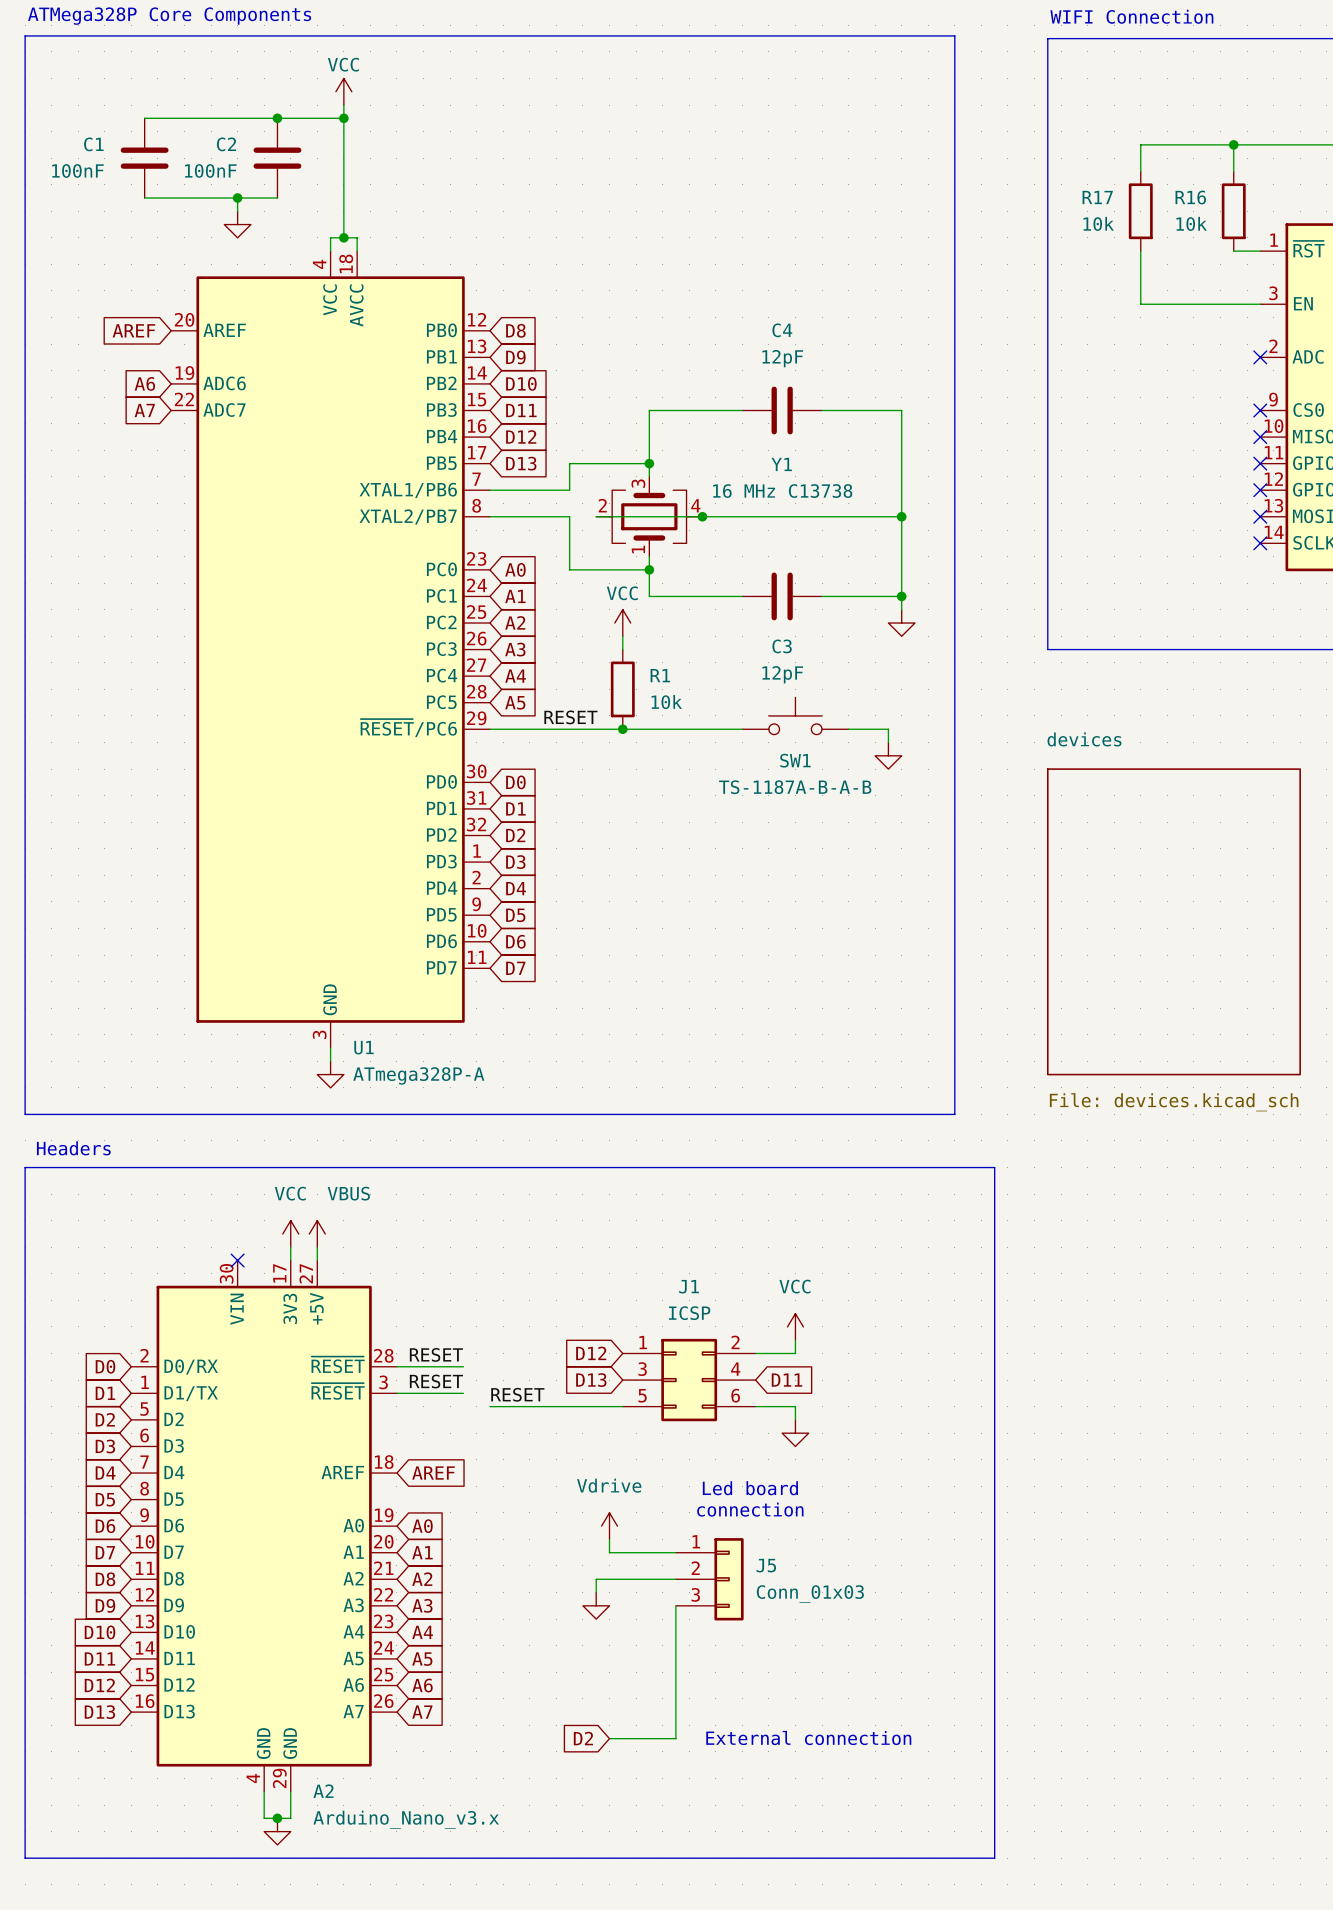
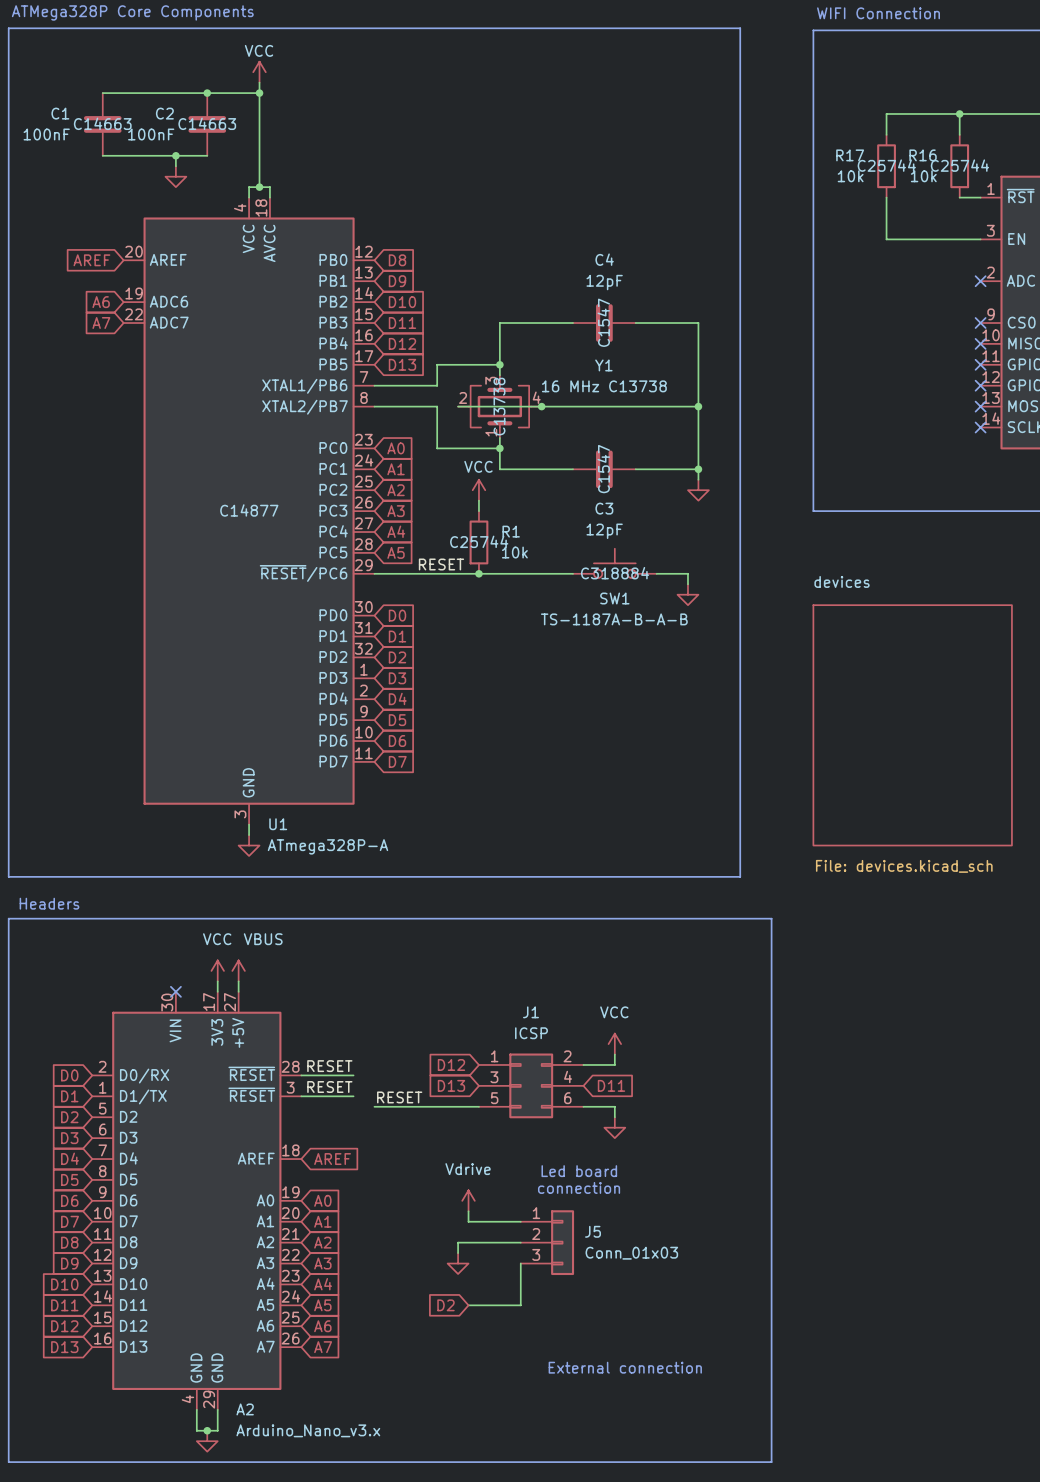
C1 text: none -> C14663 (102, 123)
C2 text: none -> C14663 (207, 123)
R17 text: none -> C25744 (886, 165)
R16 text: none -> C25744 (959, 165)
C4 text: none -> C1547 (603, 322)
Y1 text: none -> C13738 (499, 406)
C3 text: none -> C1547 (603, 469)
U1 text: none -> C14877 (249, 510)
R1 text: none -> C25744 (479, 541)
SW1 text: none -> C318884 (615, 573)
wire: (675, 1658) (675, 1738) (609, 1738) -> (520, 1305) (468, 1305)
global label position: D2 (583, 1738) -> D2 (445, 1305)

